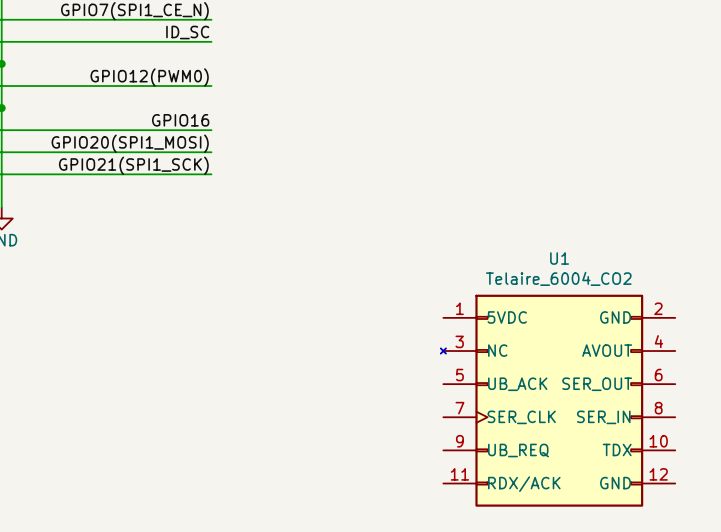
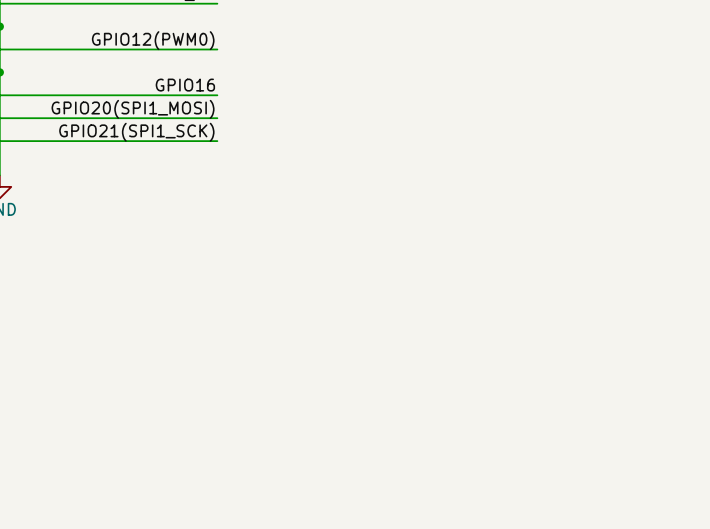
U1: Telaire_6004_CO2 (558, 400) -> none

